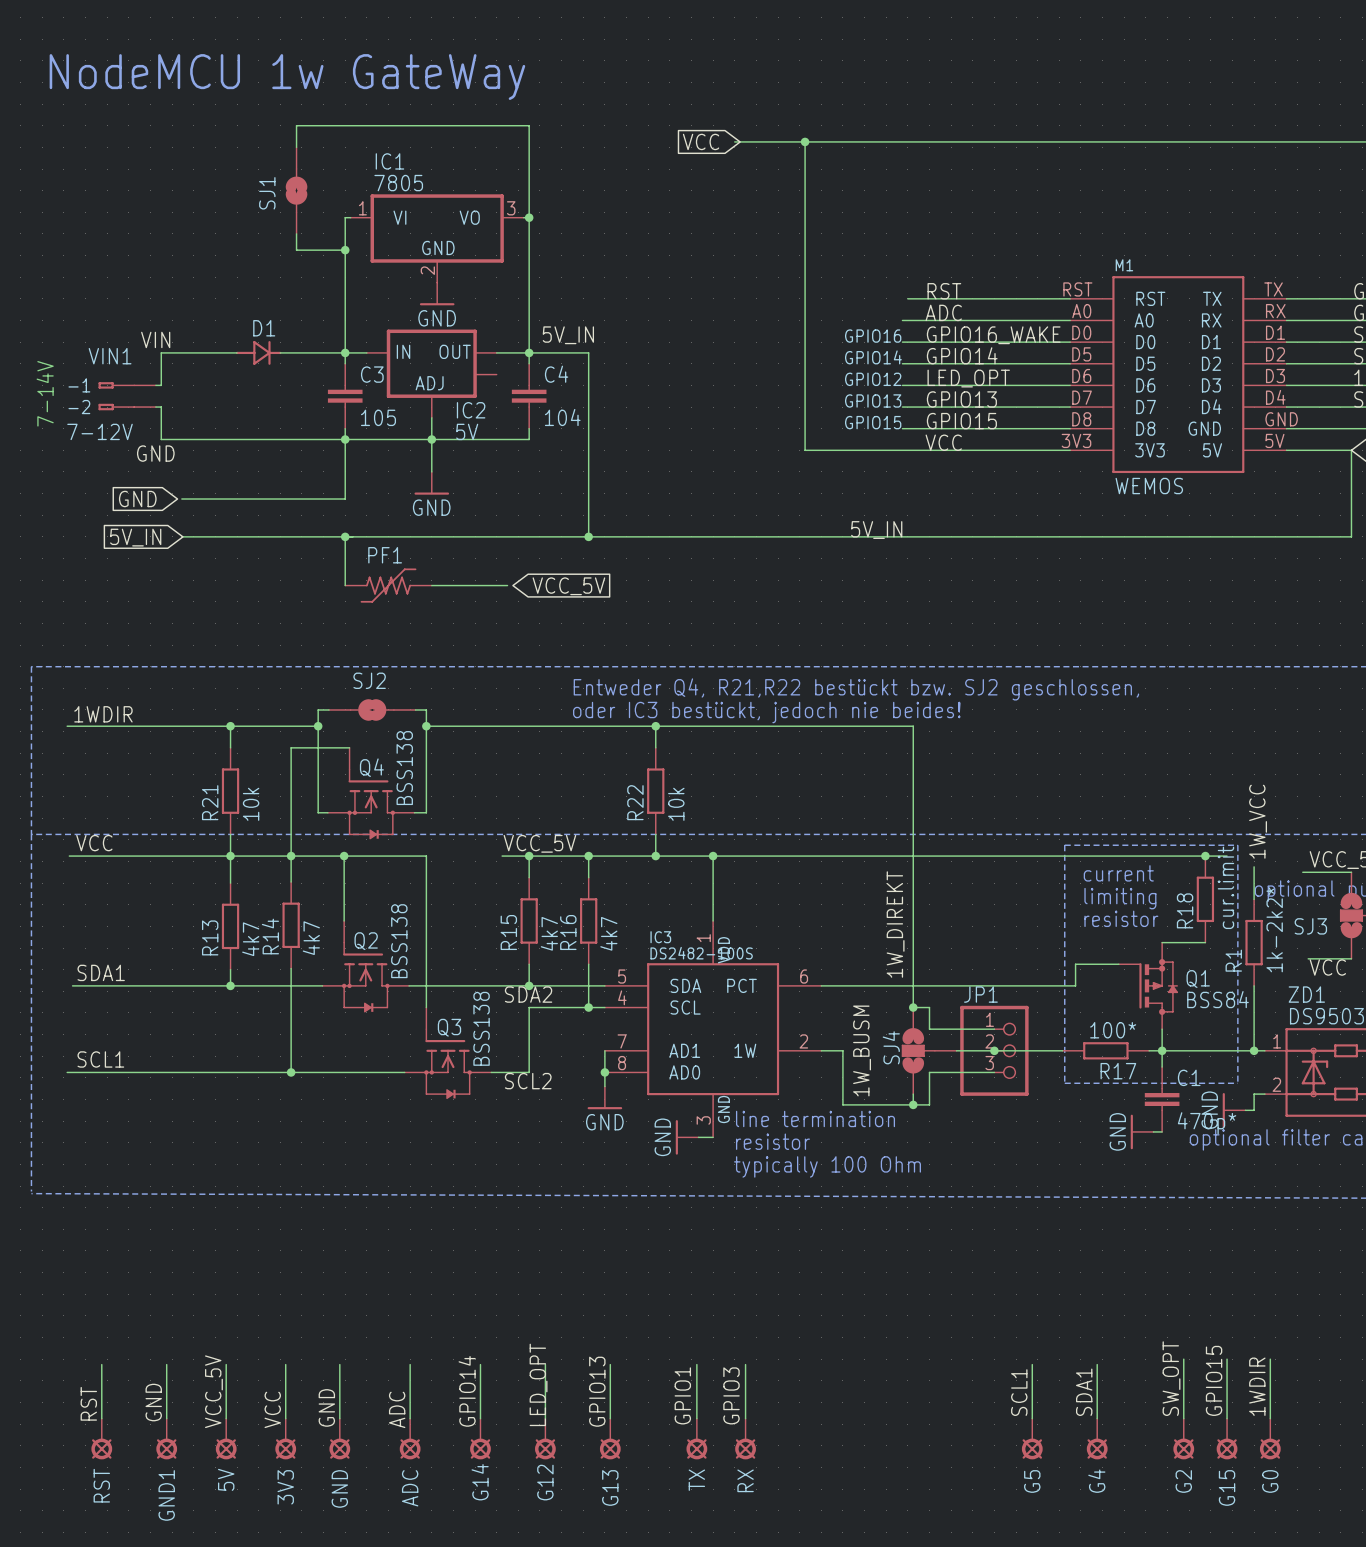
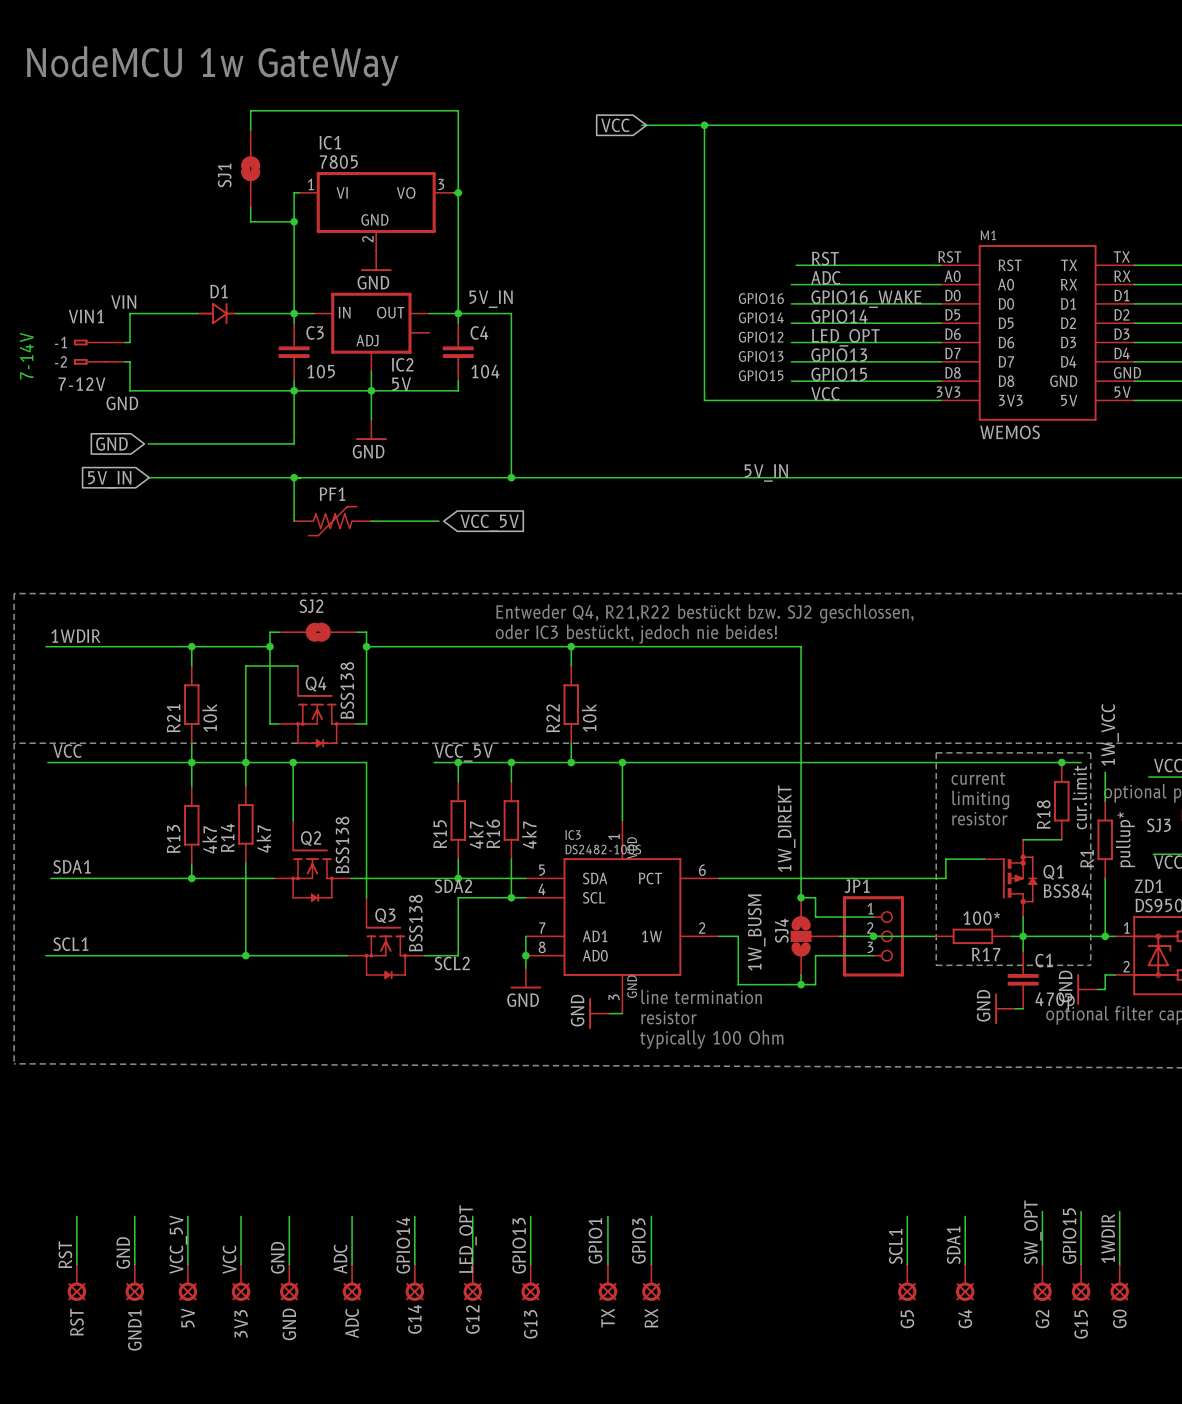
R1 value: 1k-2k2* (1274, 929) -> pullup* (1125, 839)
C1 value: 470p* (1207, 1123) -> 470p (1055, 1001)

